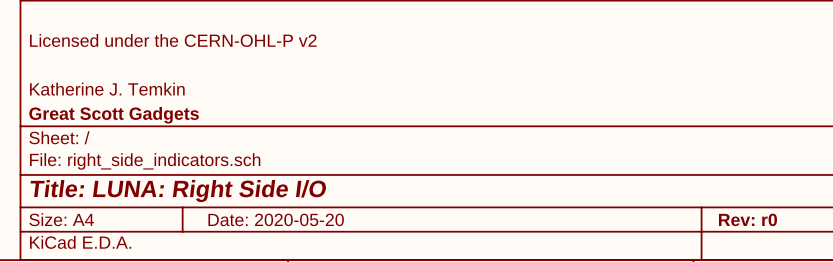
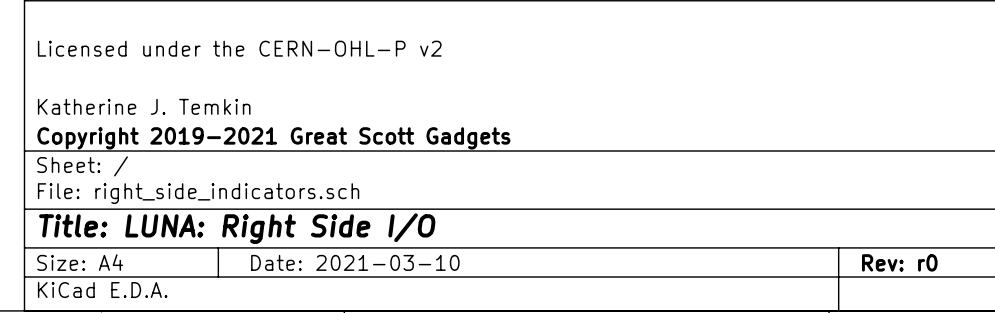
title block: Great Scott Gadgets (114, 115) -> Copyright 2019-2021 Great Scott Gadgets (273, 138)
title block: Date: 2020-05-20 (276, 219) -> Date: 2021-03-10 (355, 262)

